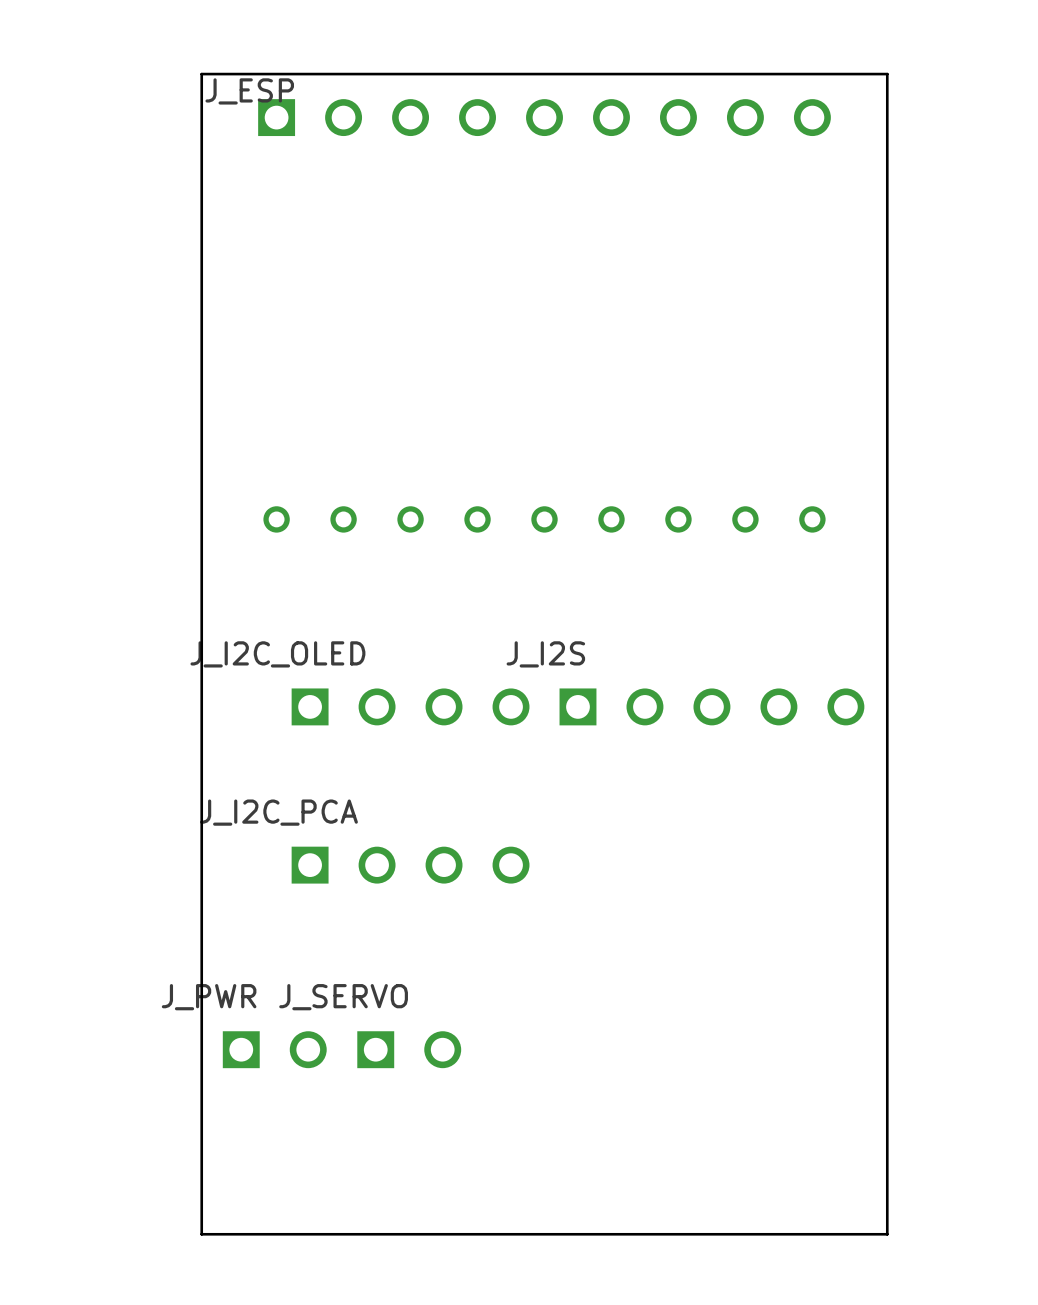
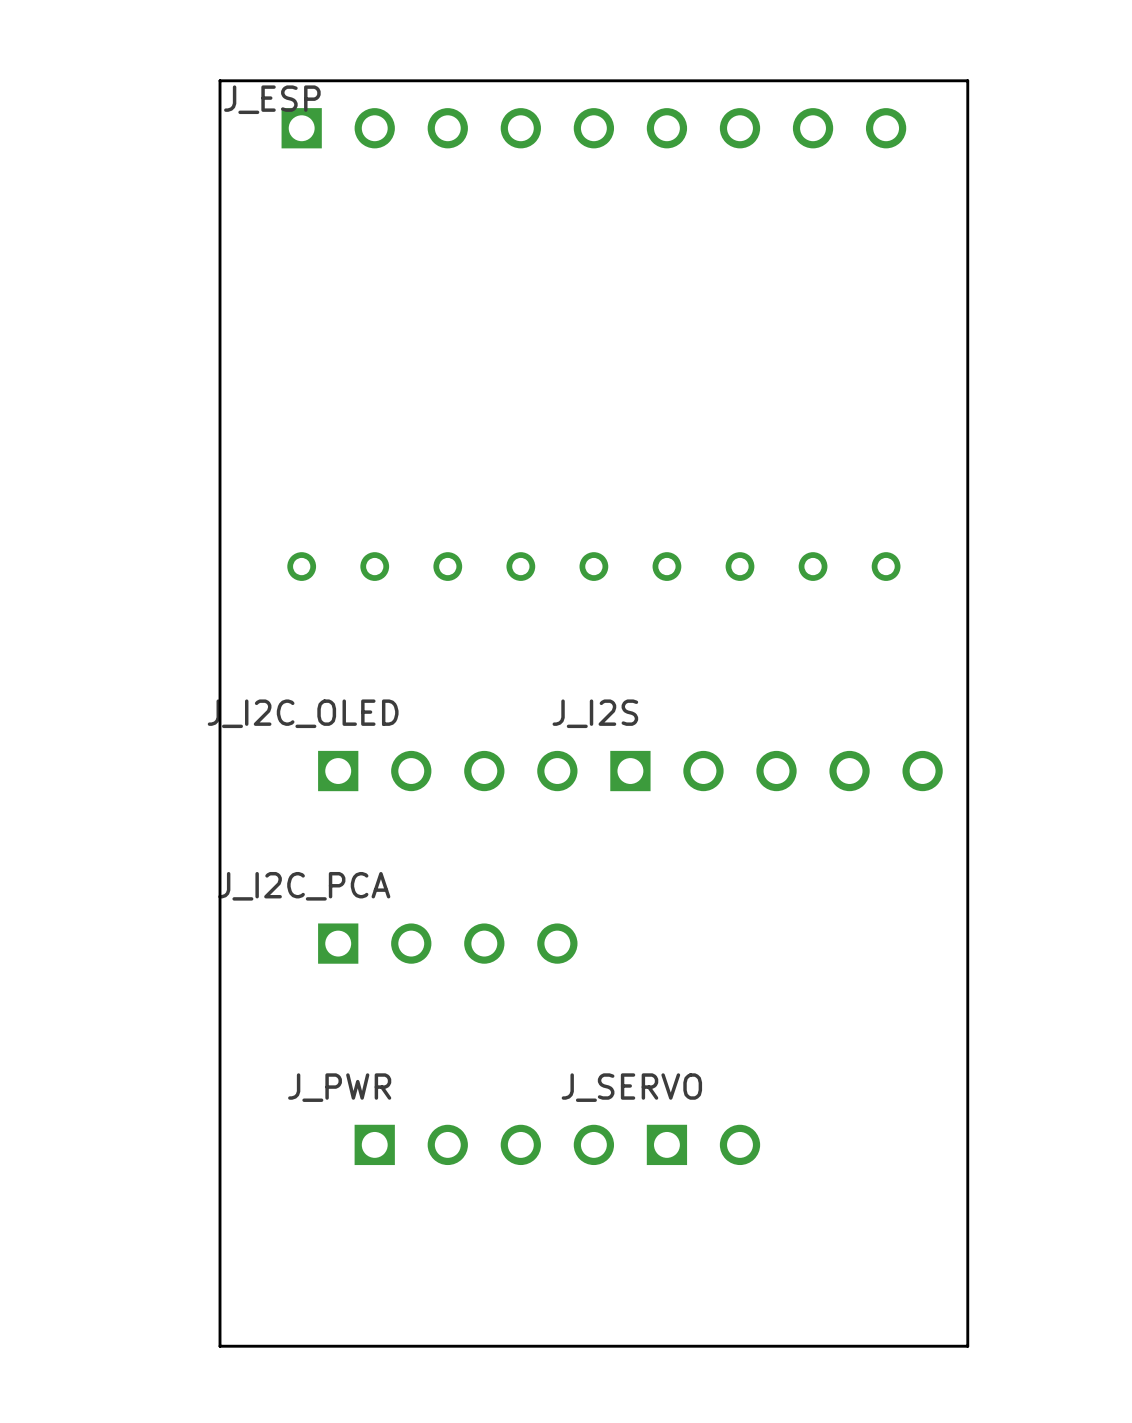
J_PWR: (274, 1049) -> none
J_SERVO position: (409, 1049) -> (703, 1144)
J_PWR: none -> (484, 1144)

